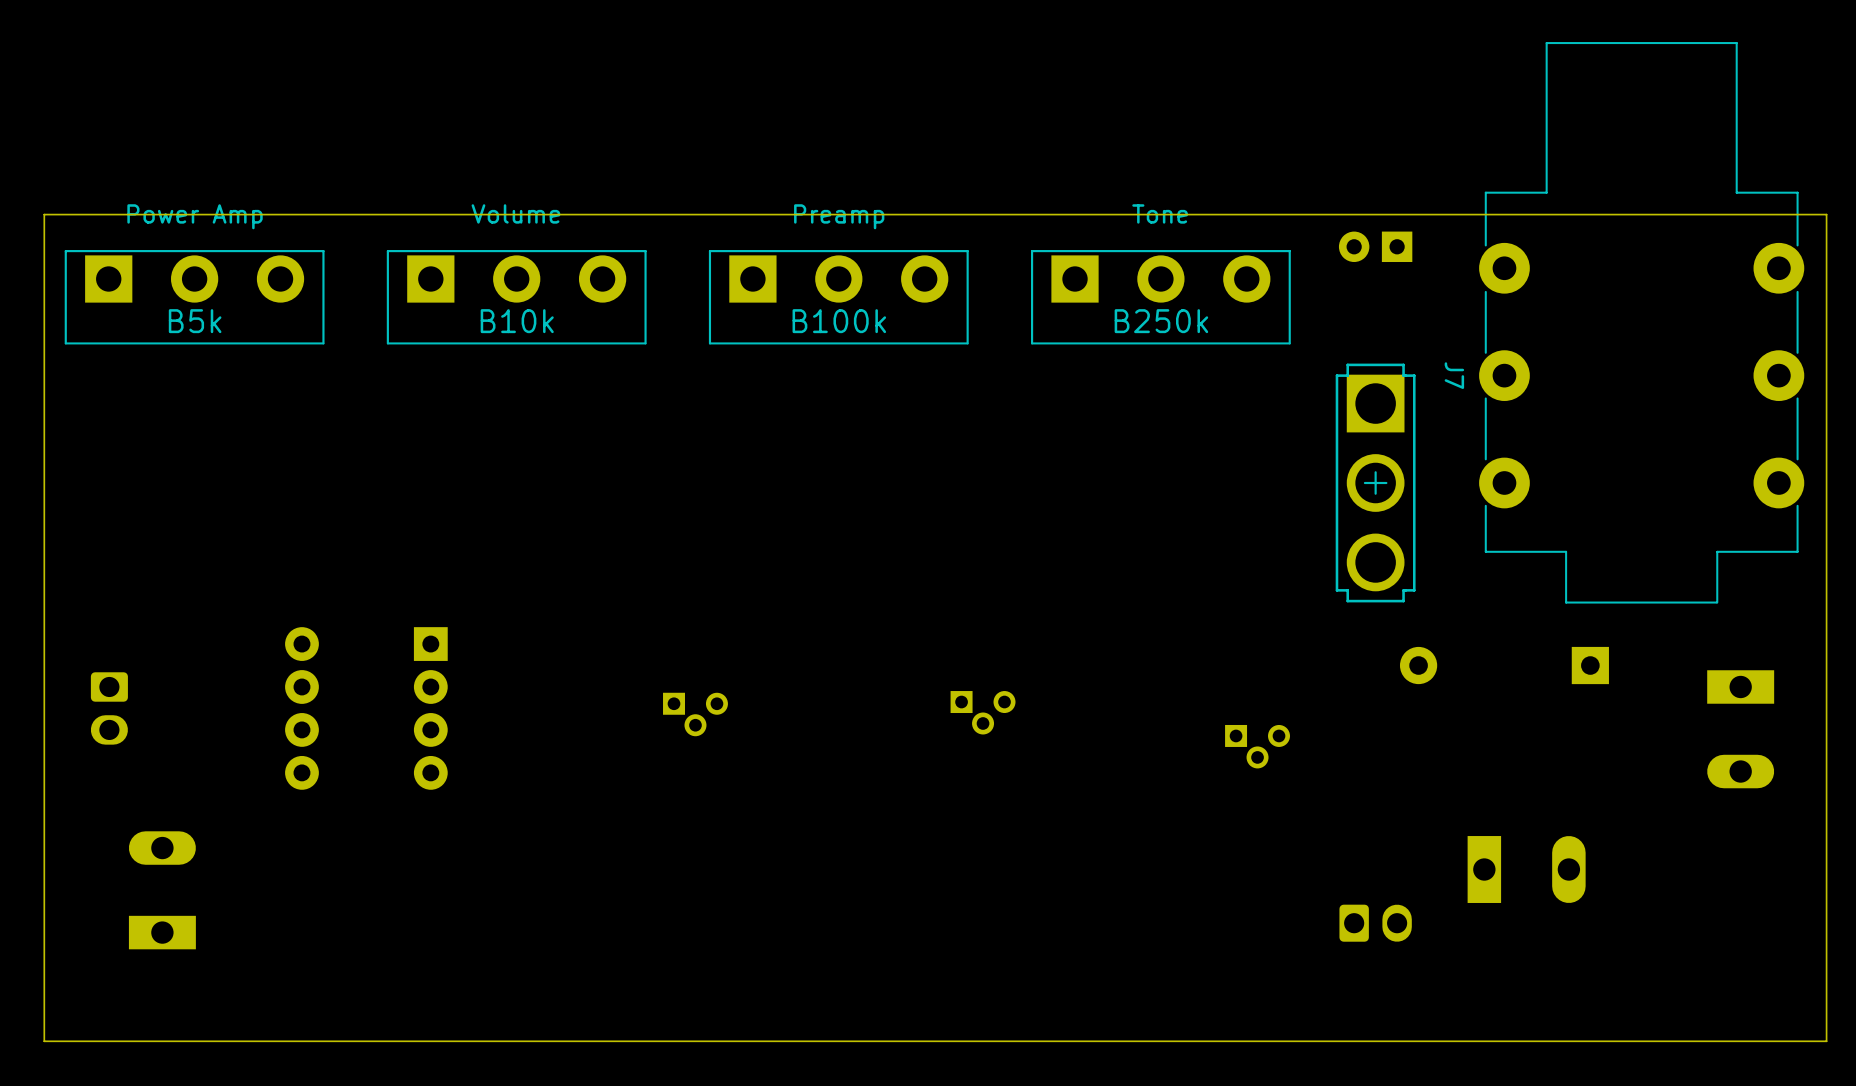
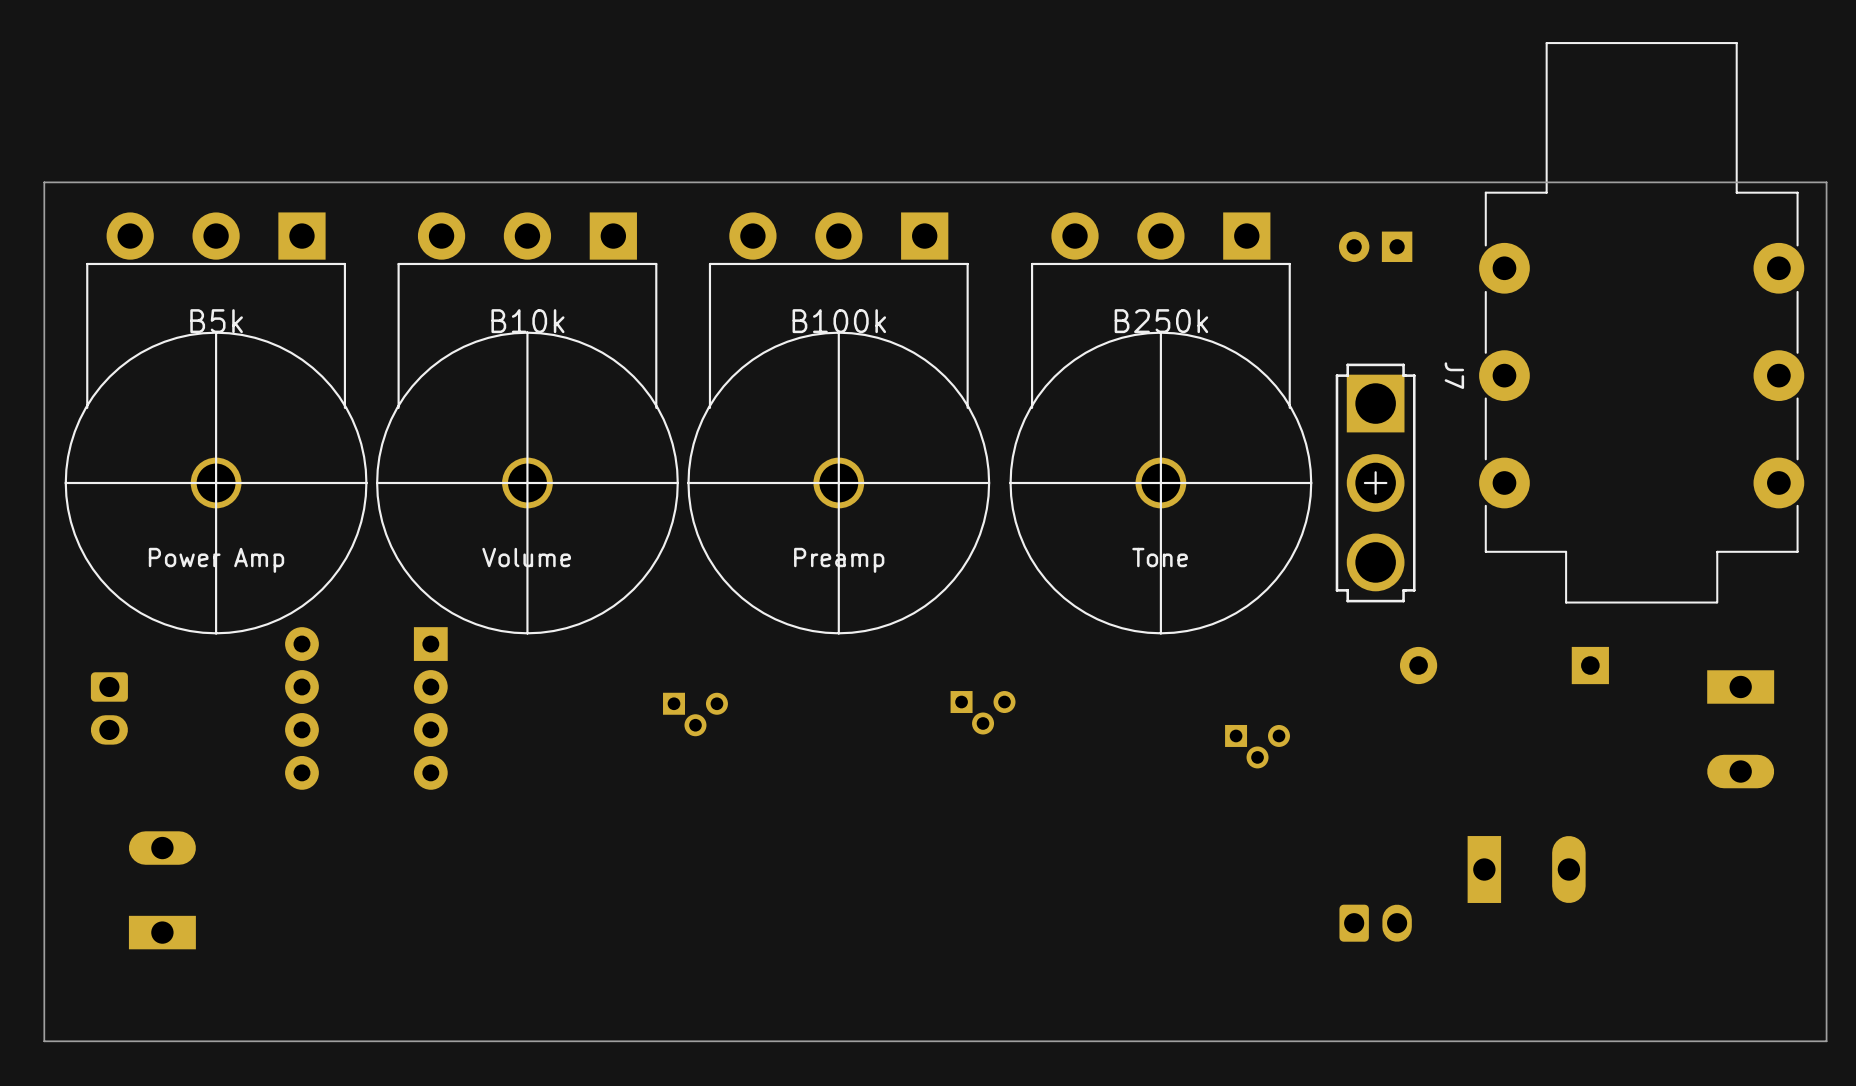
board edge: (1826, 214) (44, 214) -> (1826, 214) (1826, 182) (44, 182) (44, 214)
part: B5k (194, 297) -> none
part: B10k (516, 297) -> none
part: B100k (838, 297) -> none
part: B250k (1160, 297) -> none
part: none -> B5k (216, 423)
part: none -> B10k (527, 423)
part: none -> B100k (838, 423)
part: none -> B250k (1160, 423)

